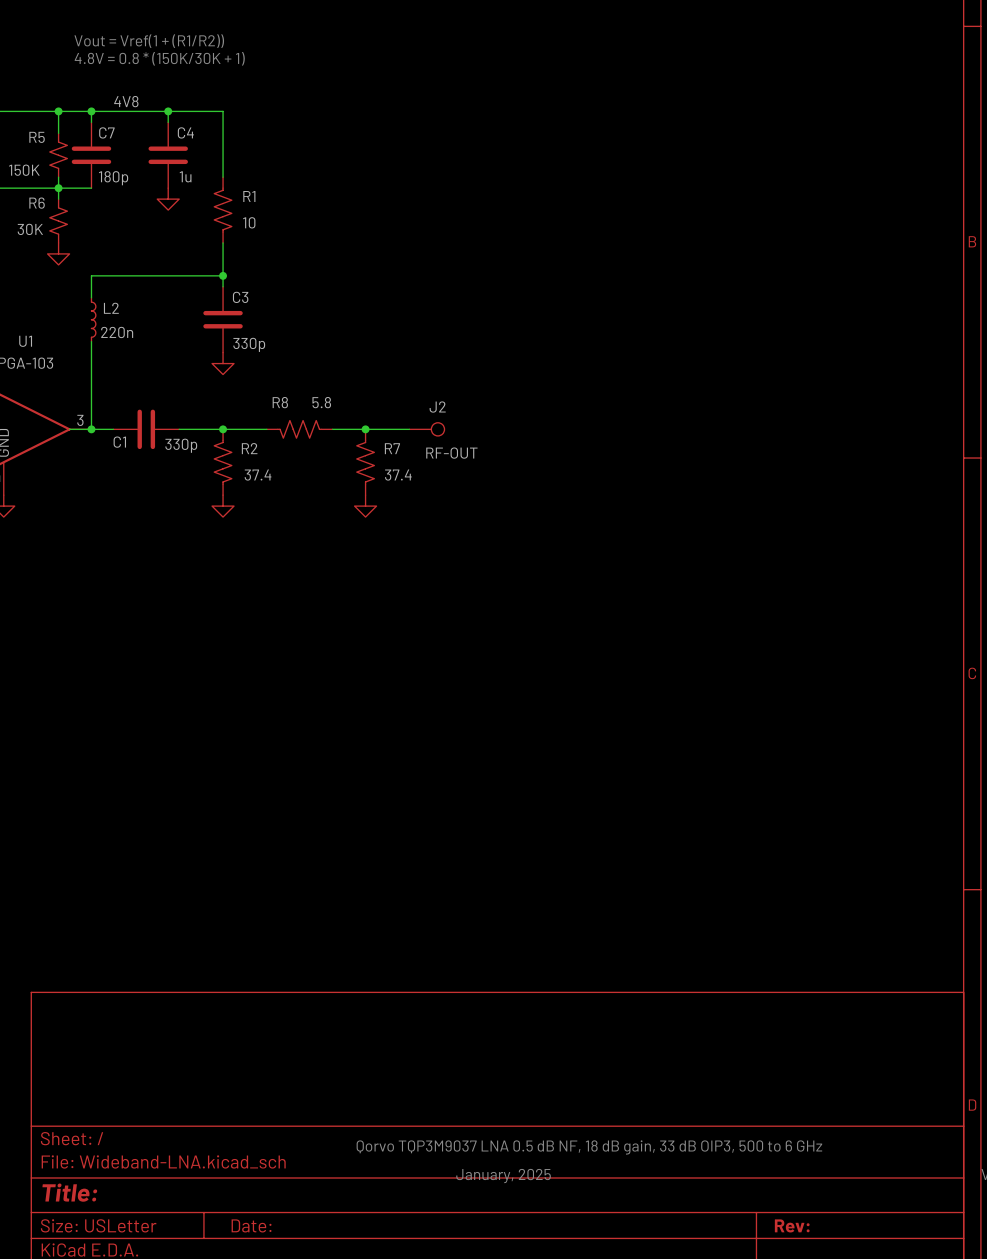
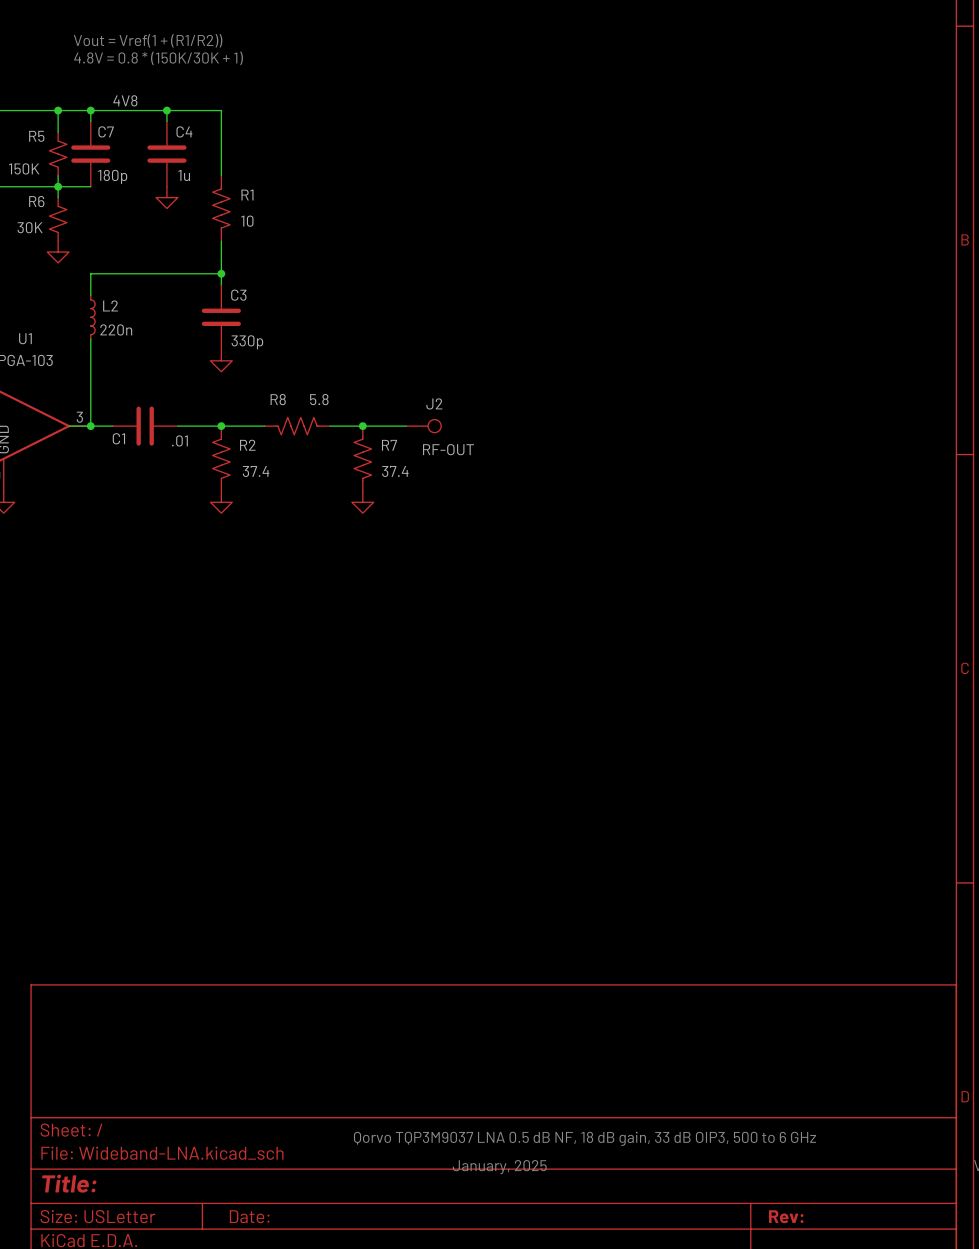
C1 value: 330p (181, 445) -> .01 (179, 440)

